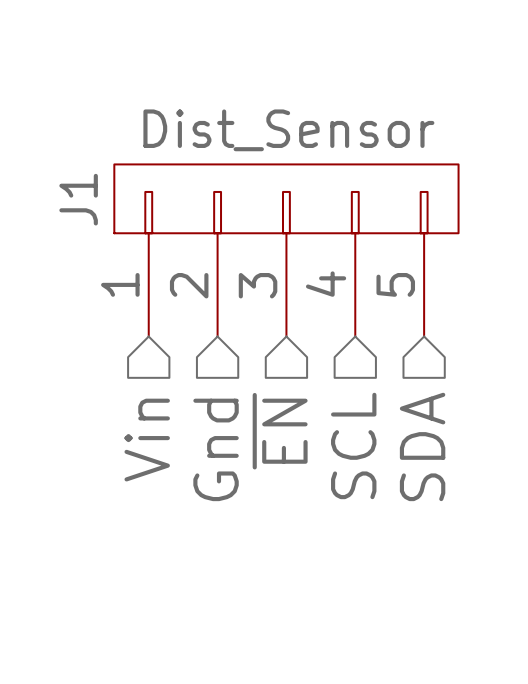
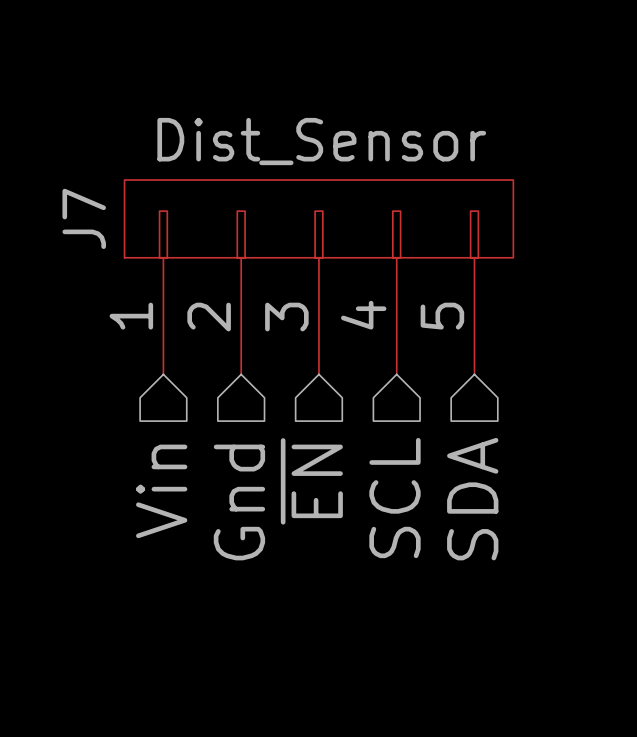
J1 name: J1 (78, 199) -> J7 (84, 218)

